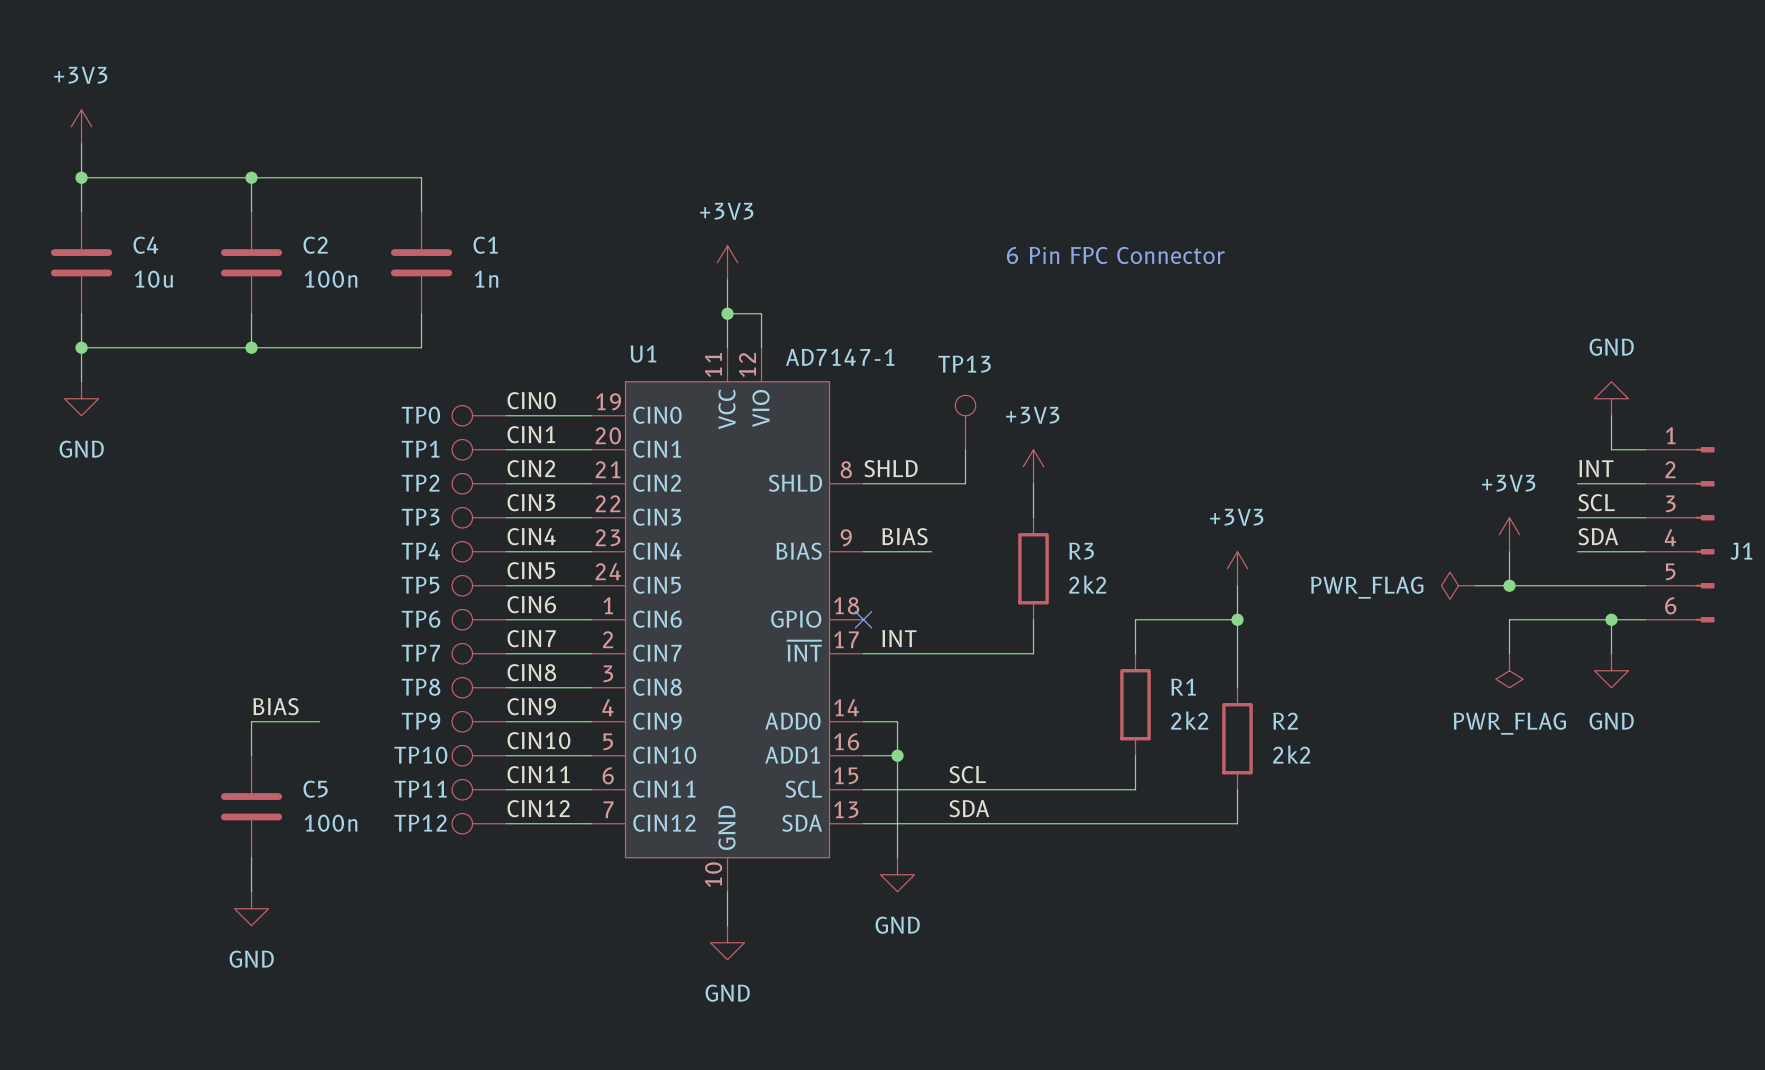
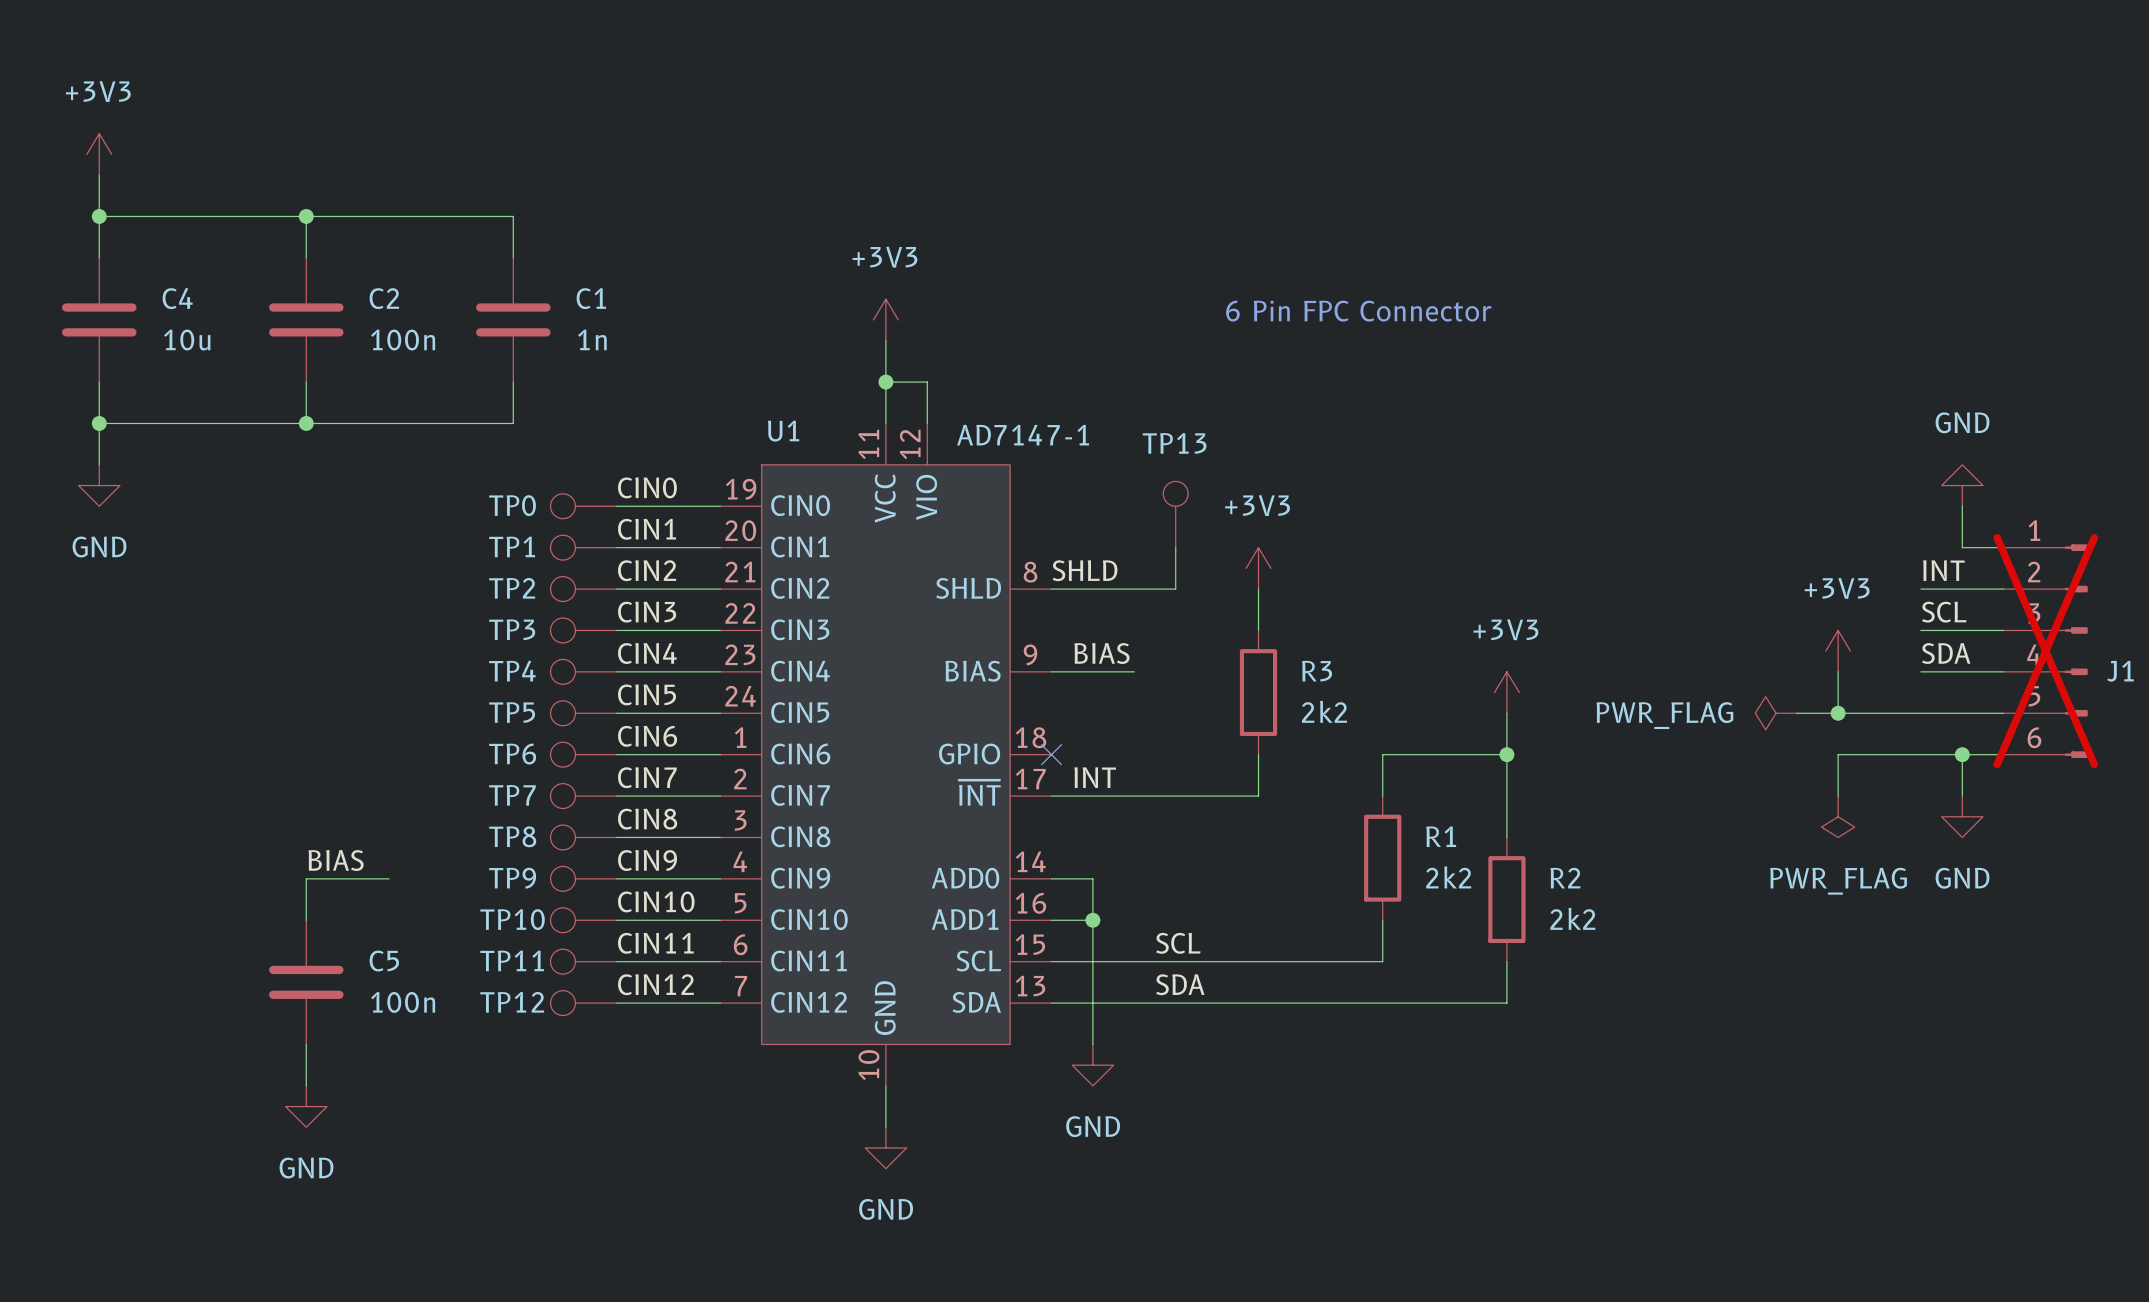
J1 do-not-place cross: none -> (2045, 651)

